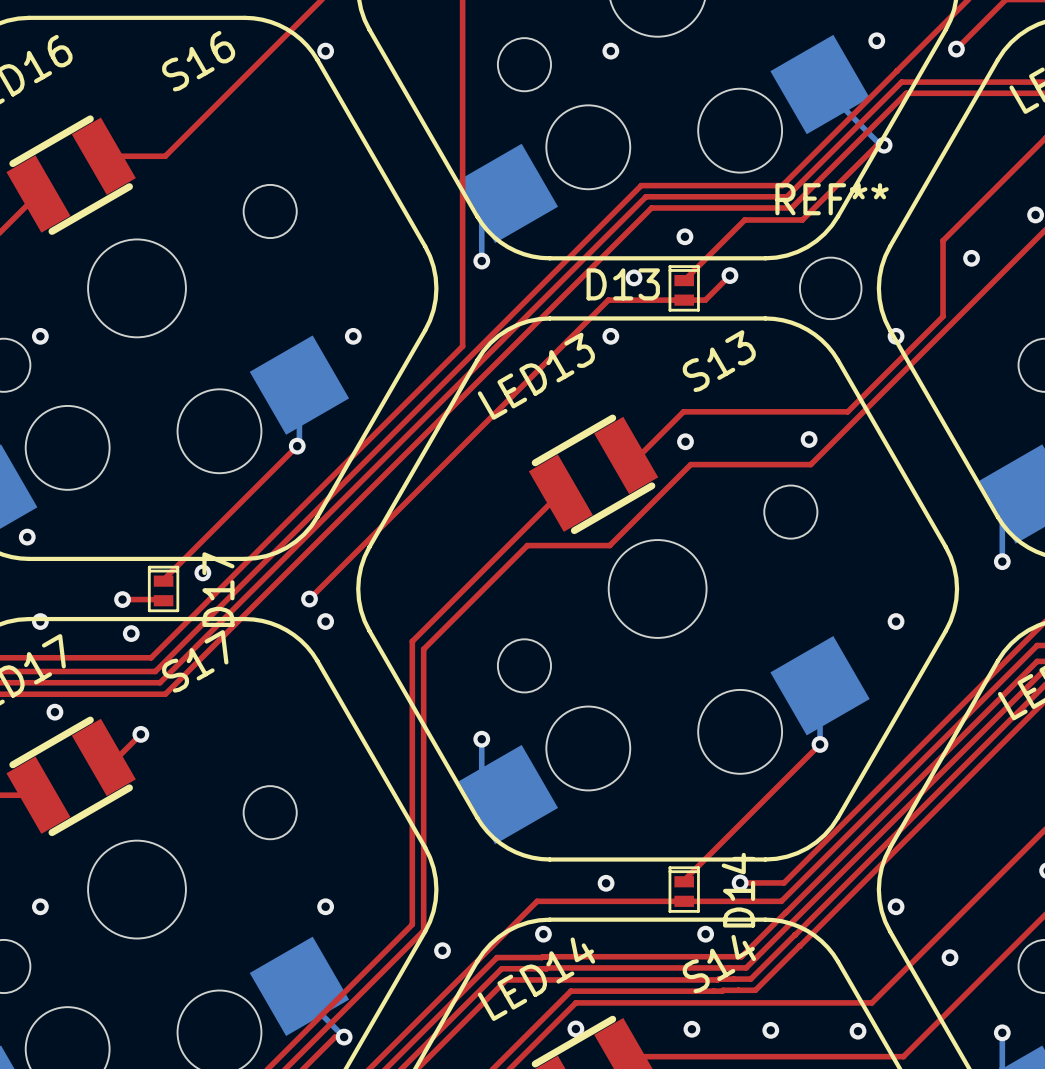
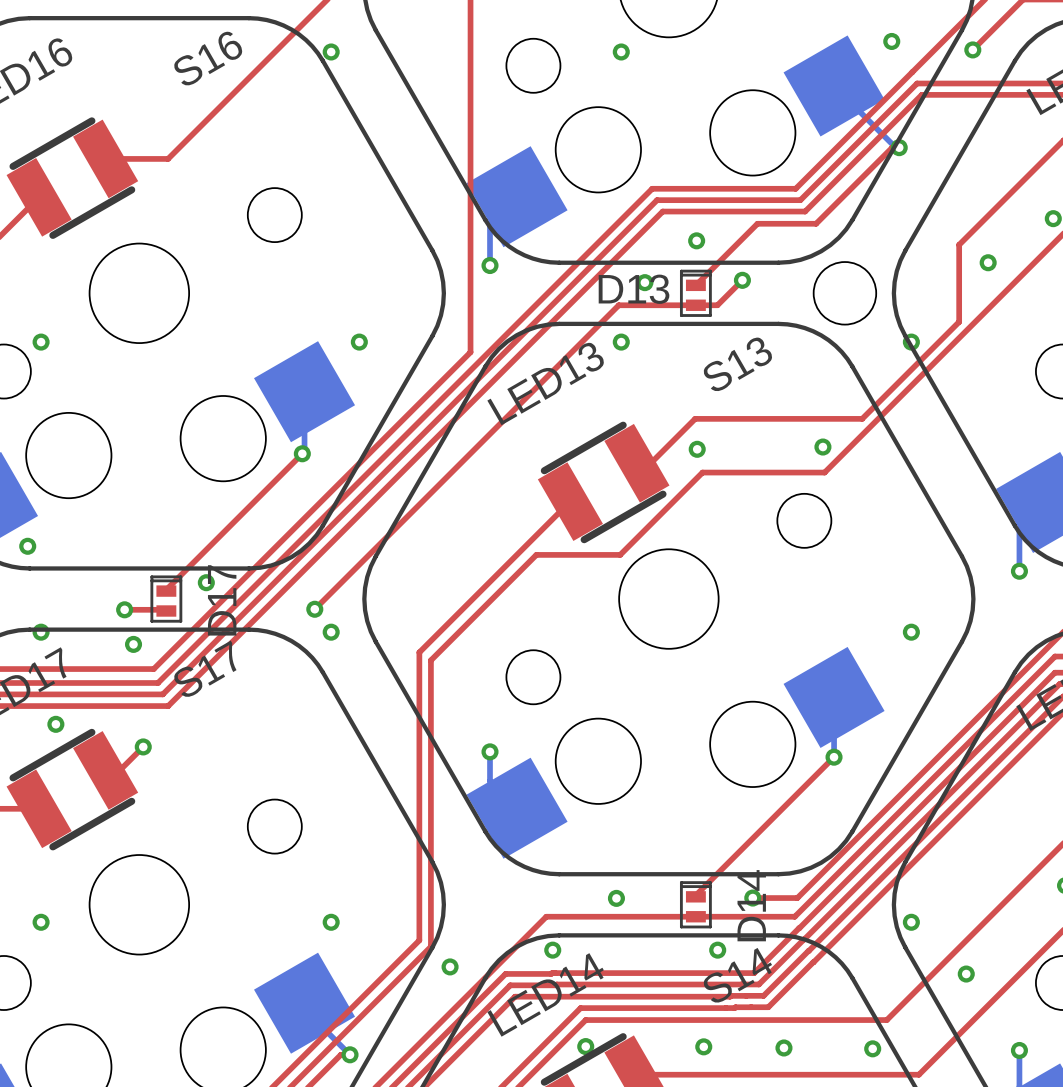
REF** name: REF** (832, 199) -> none

